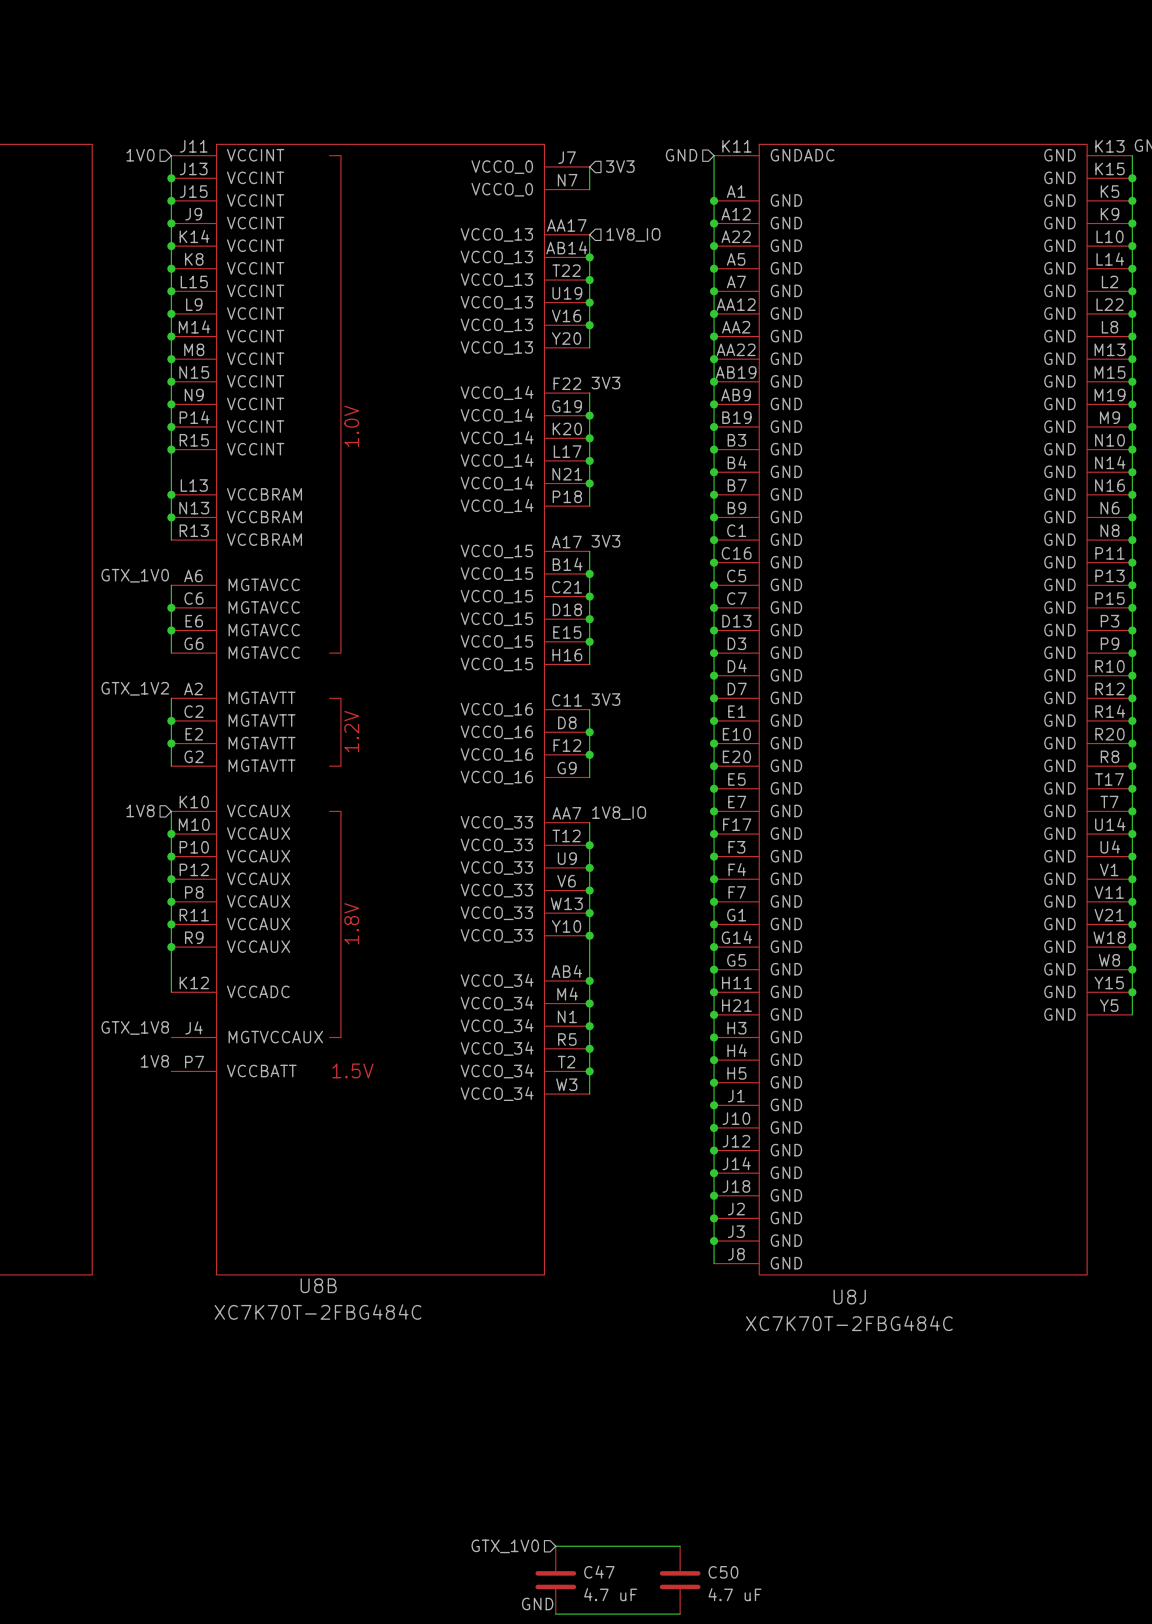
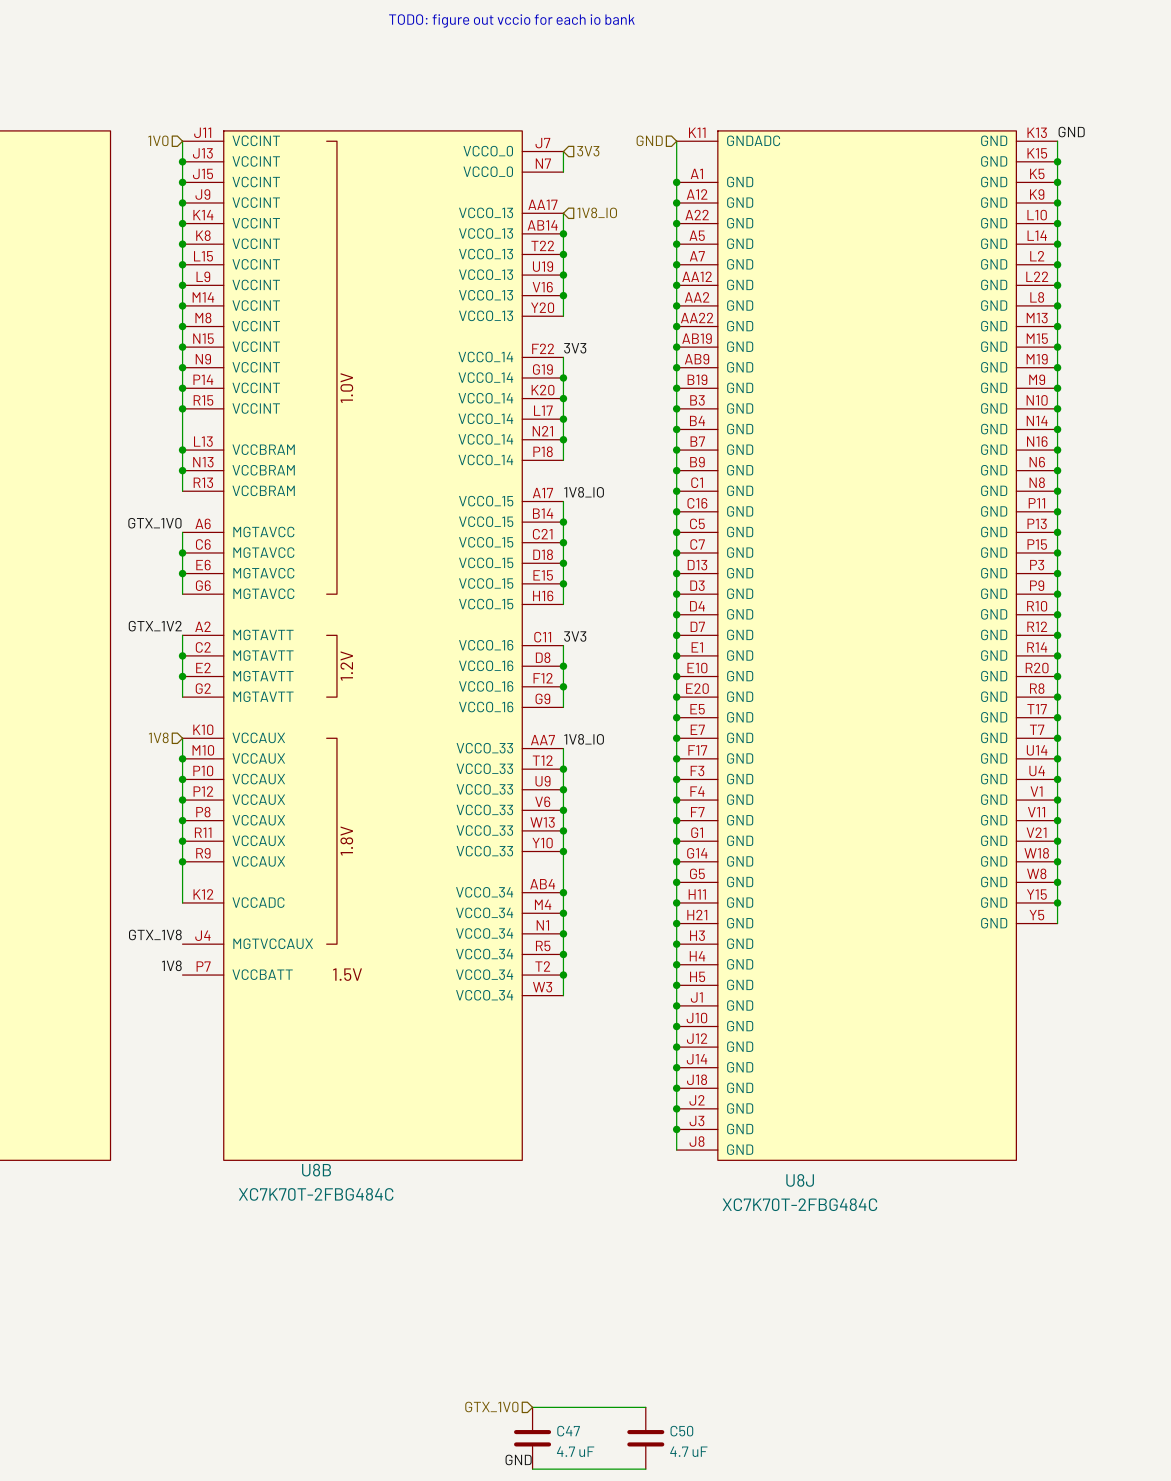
text: none -> TODO: figure out vccio for each io bank (511, 20)
label: 3V3 (605, 541) -> 1V8_IO (584, 492)

